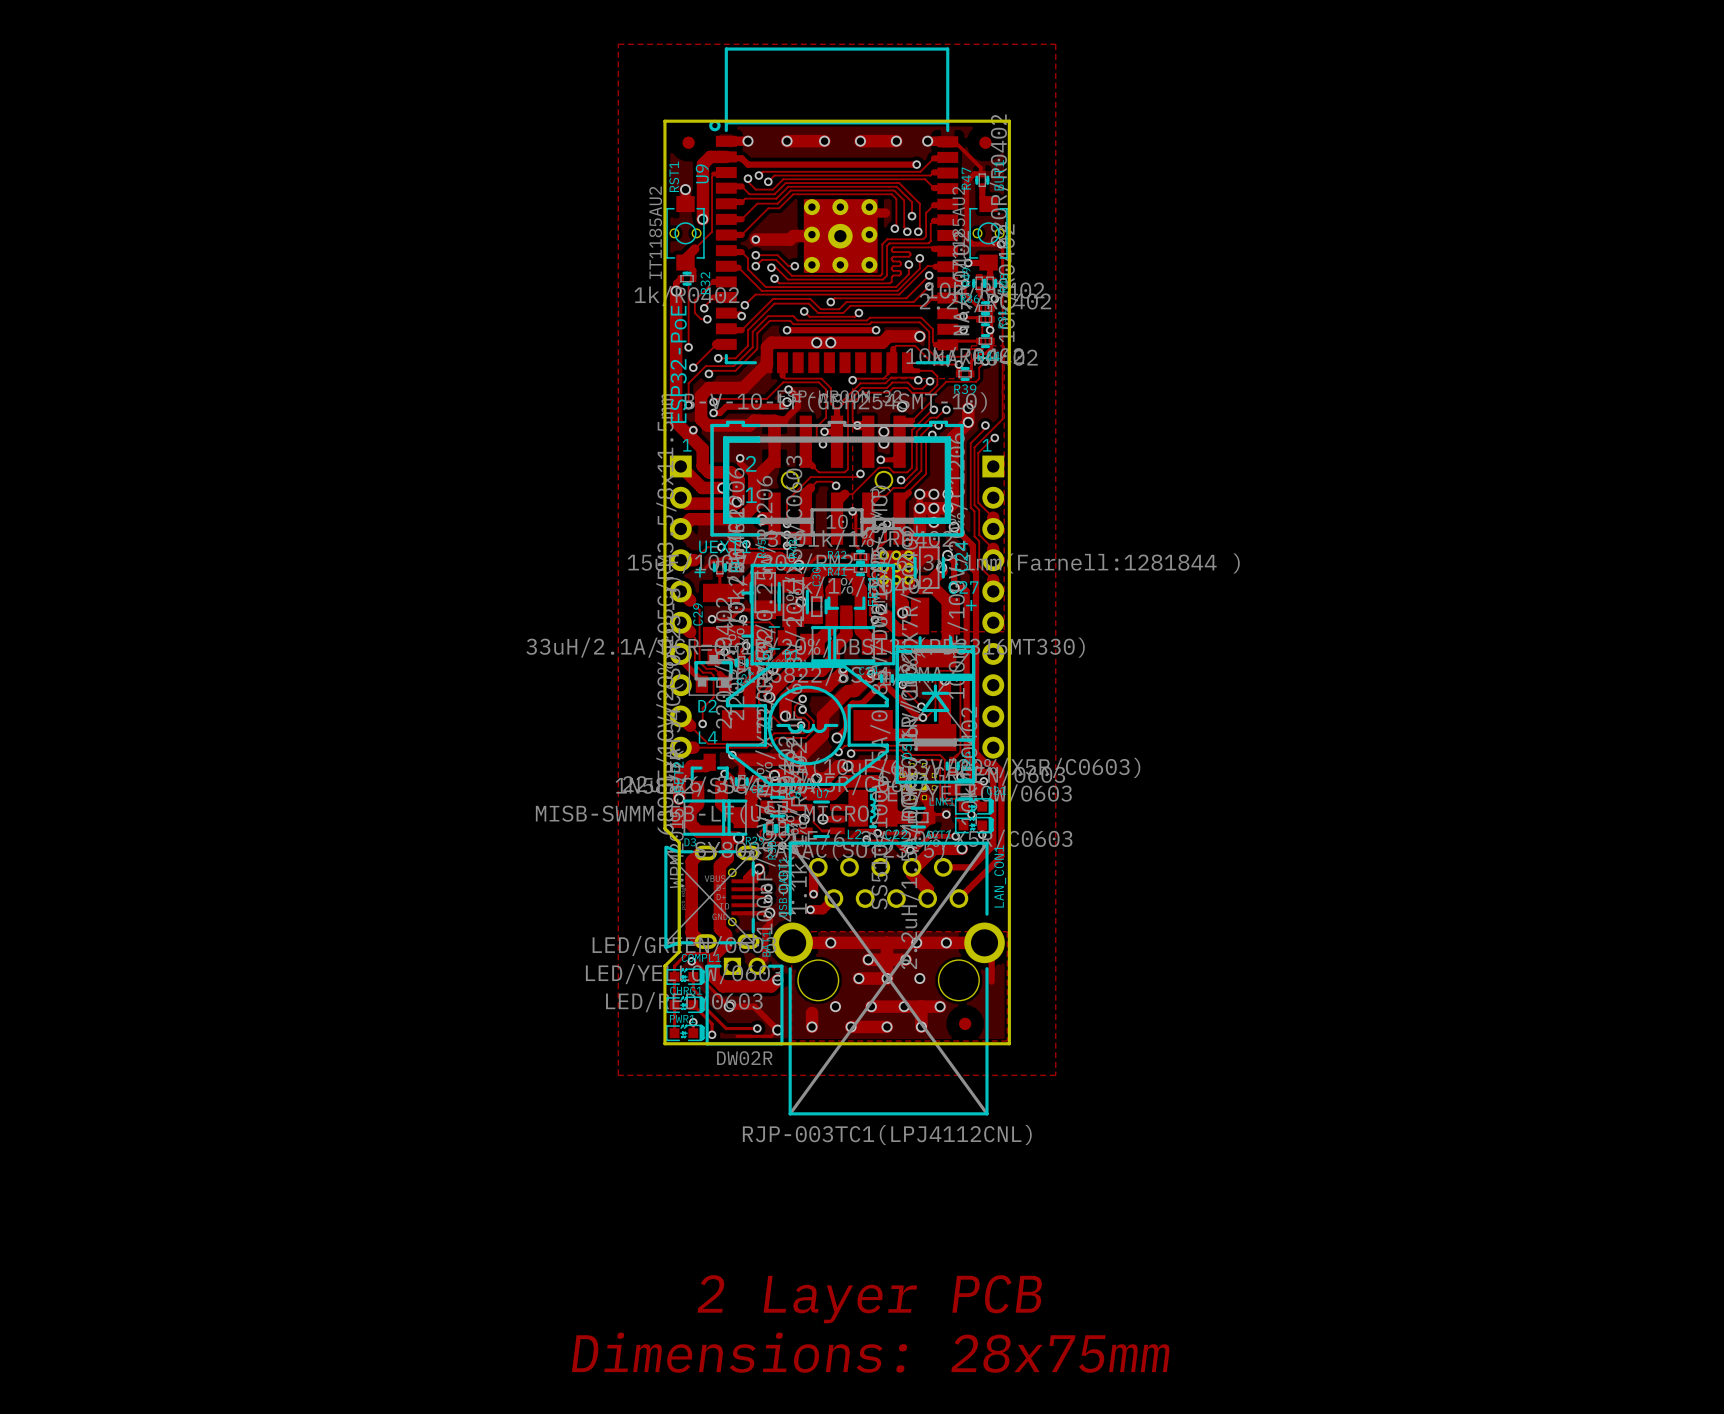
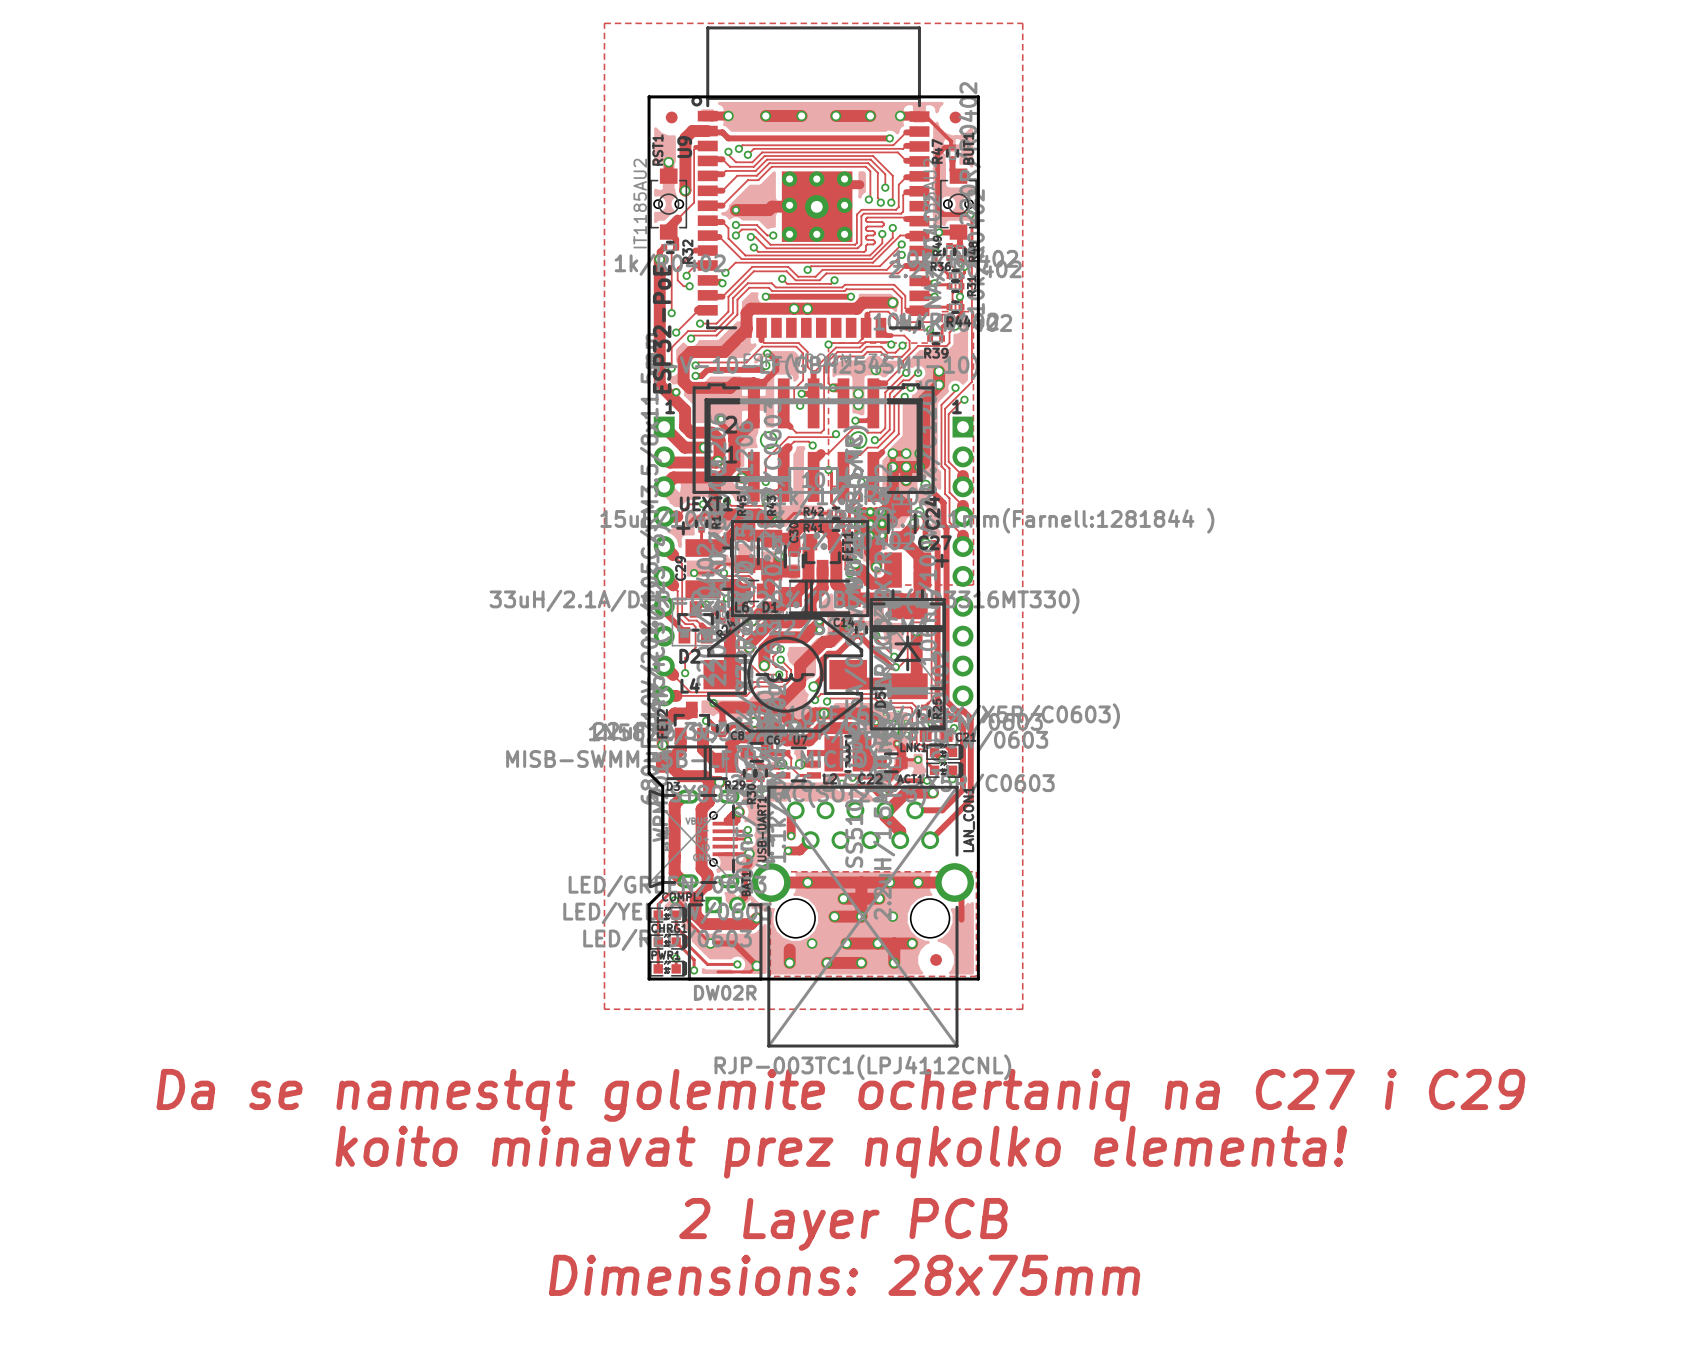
text: none -> Da se namestqt golemite ochertaniq na C27 i C29 (841, 1095)
text: none -> koito minavat prez nqkolko elementa! (841, 1152)

